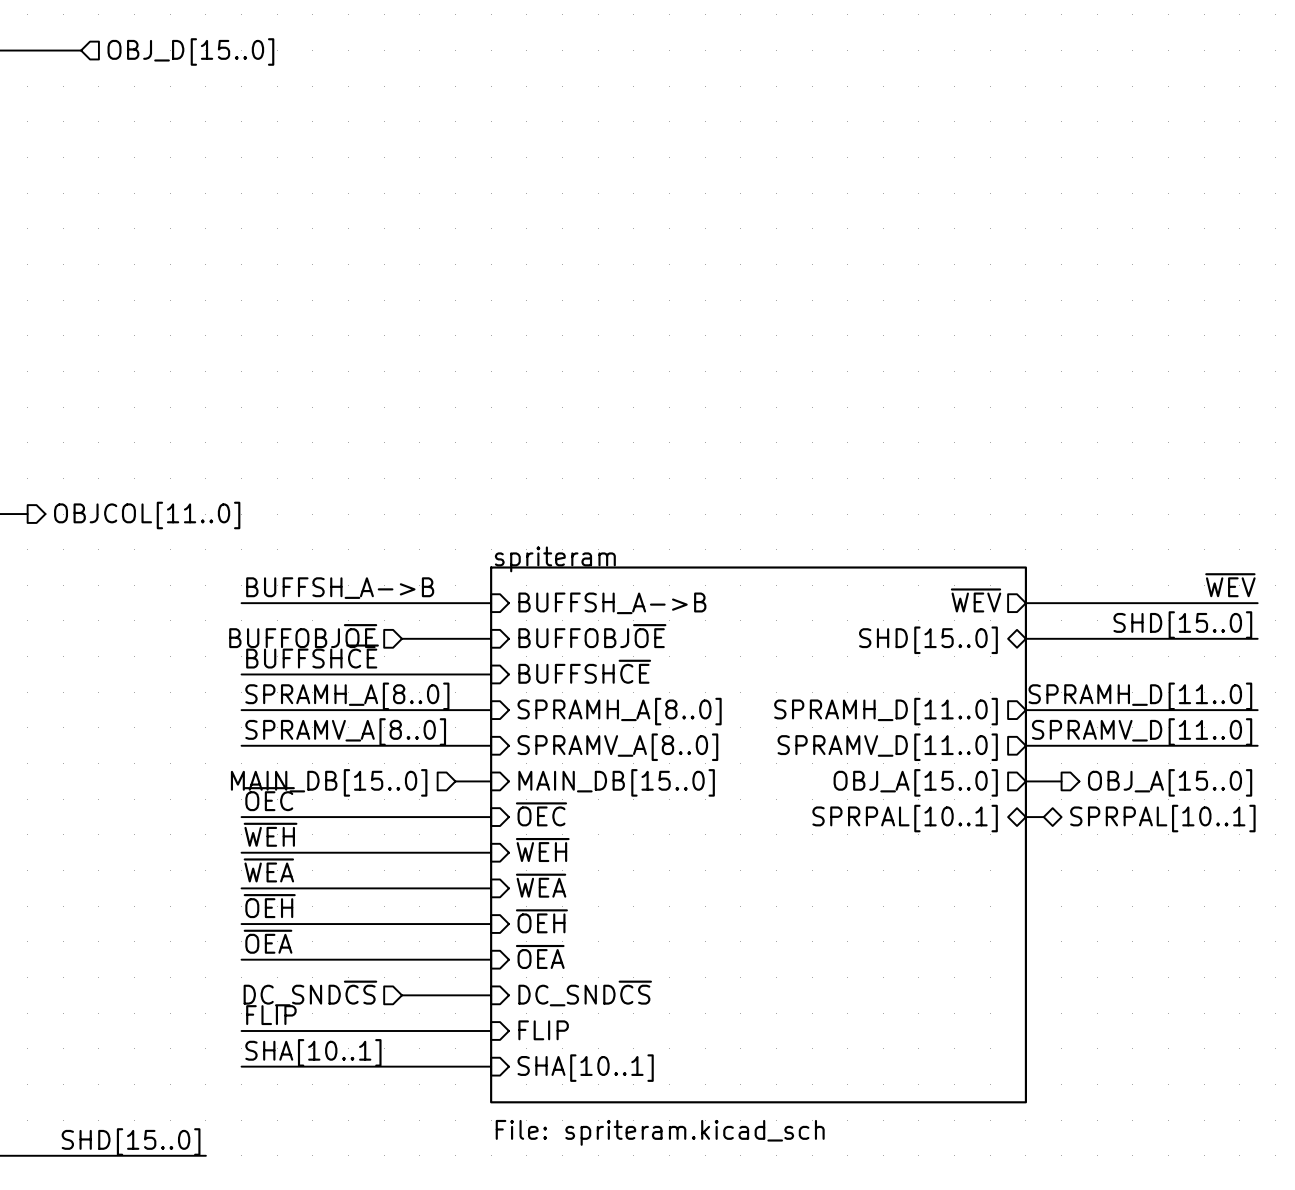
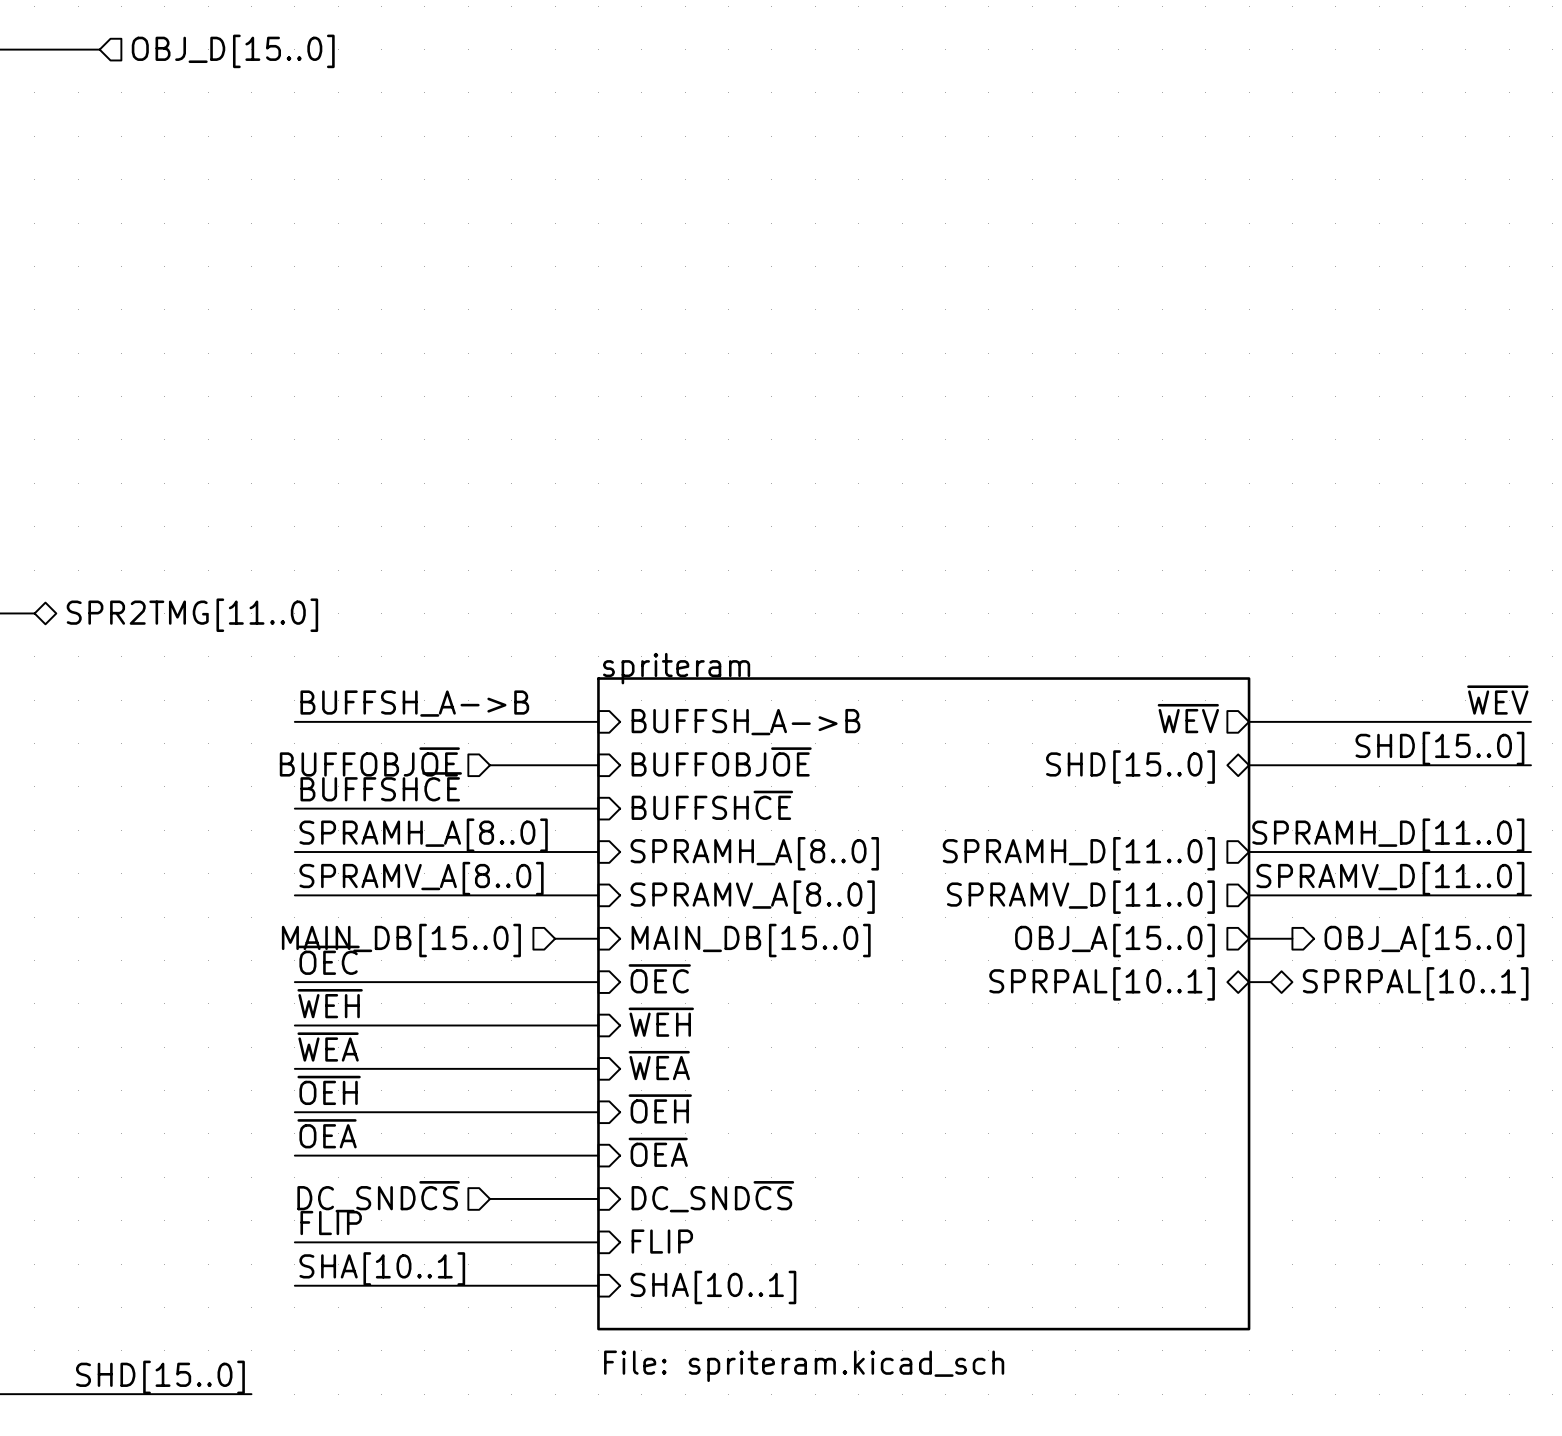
hierarchical label shape: output (147, 515) -> bidirectional (192, 615)
hierarchical label: OBJCOL[11..0] (147, 515) -> SPR2TMG[11..0] (192, 615)

